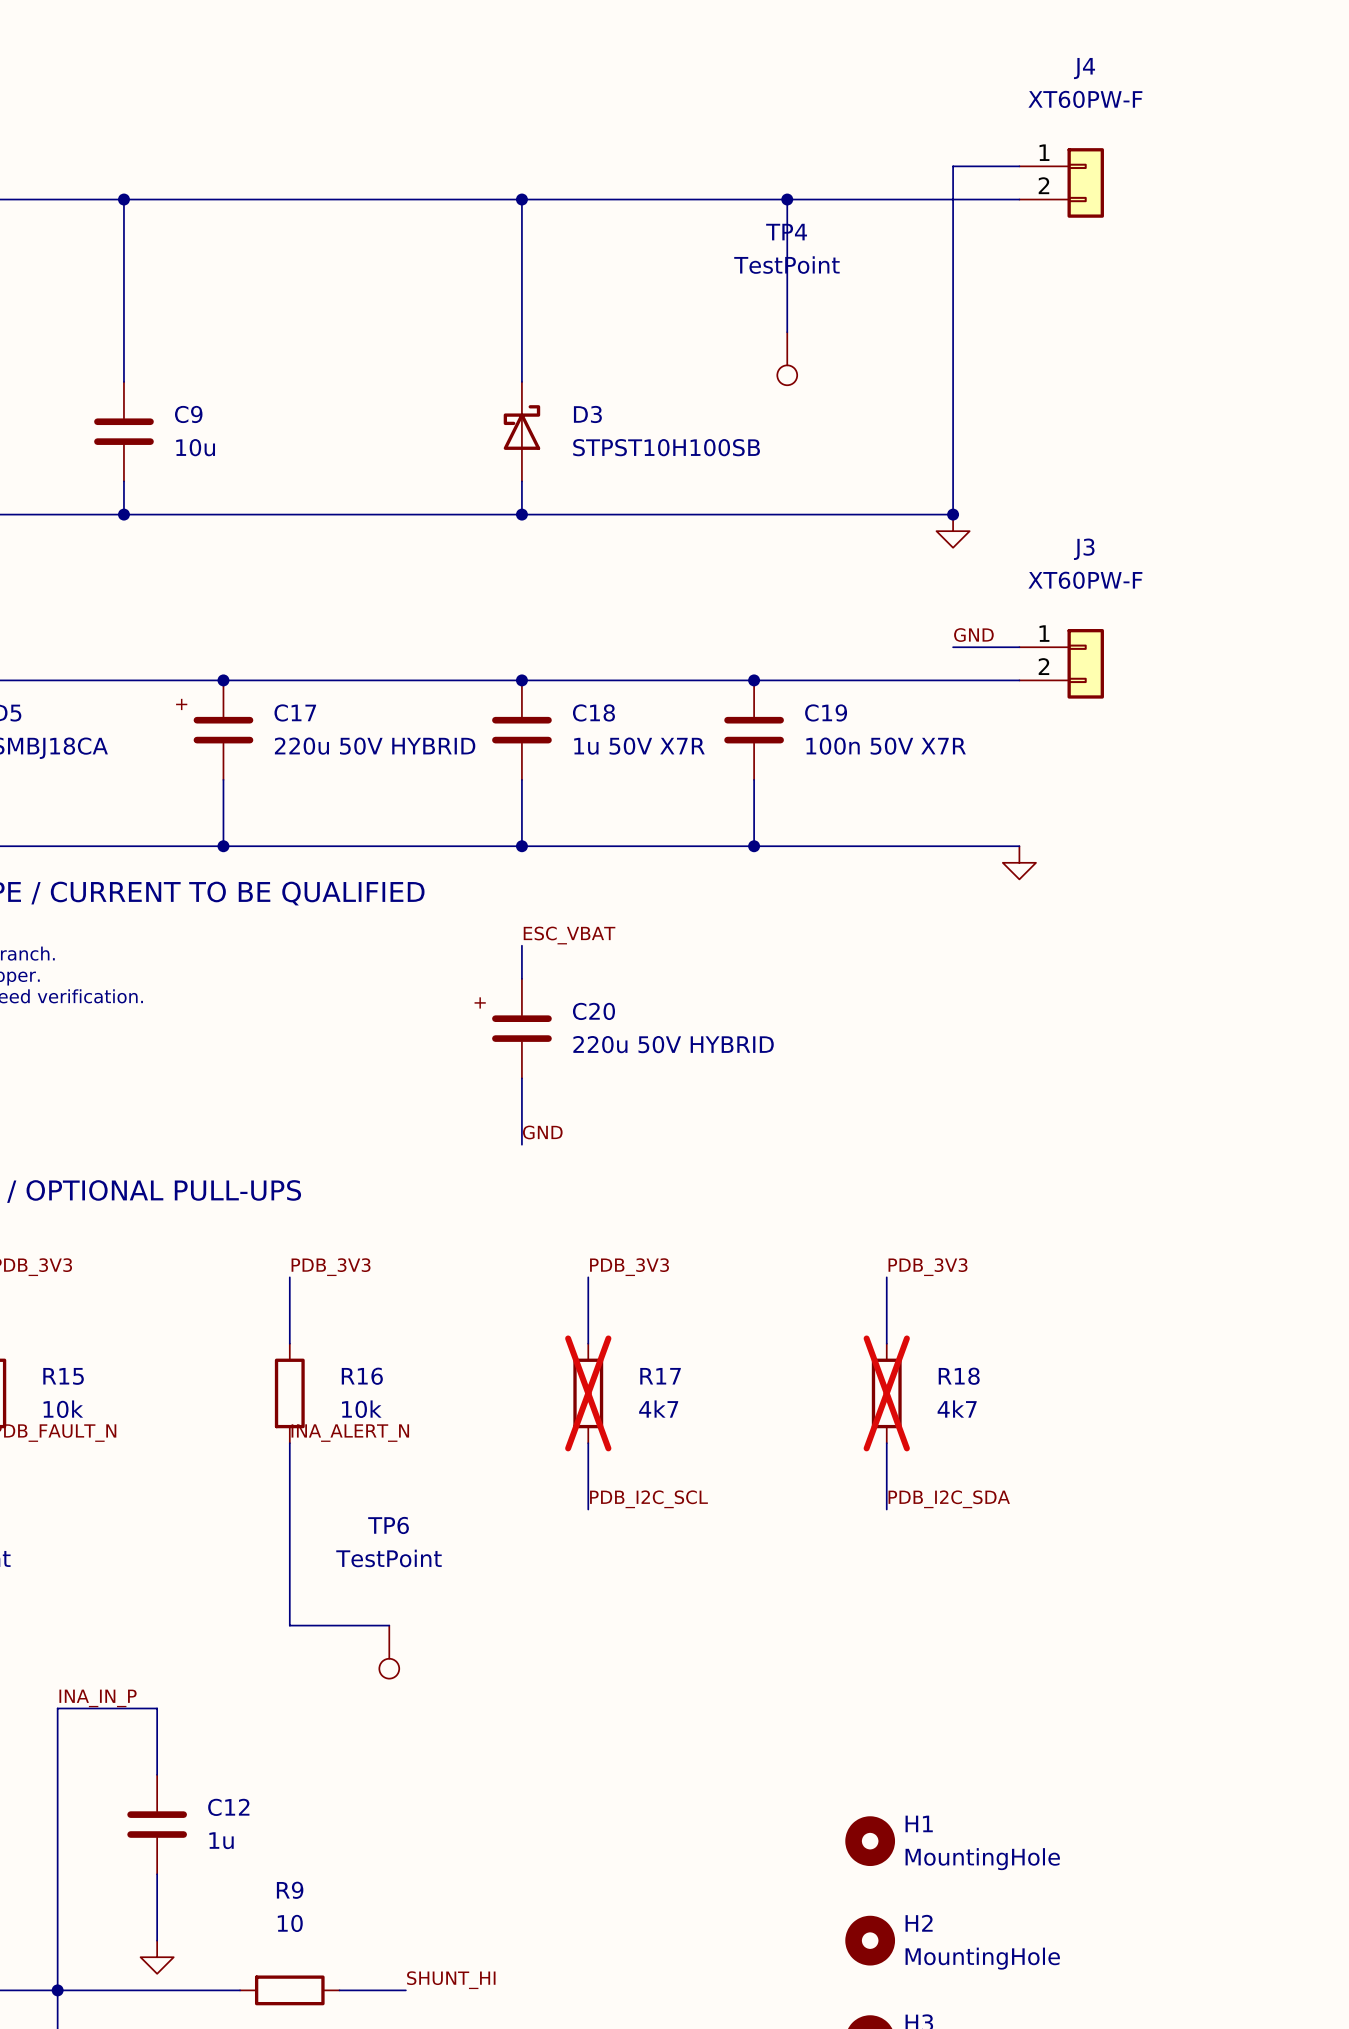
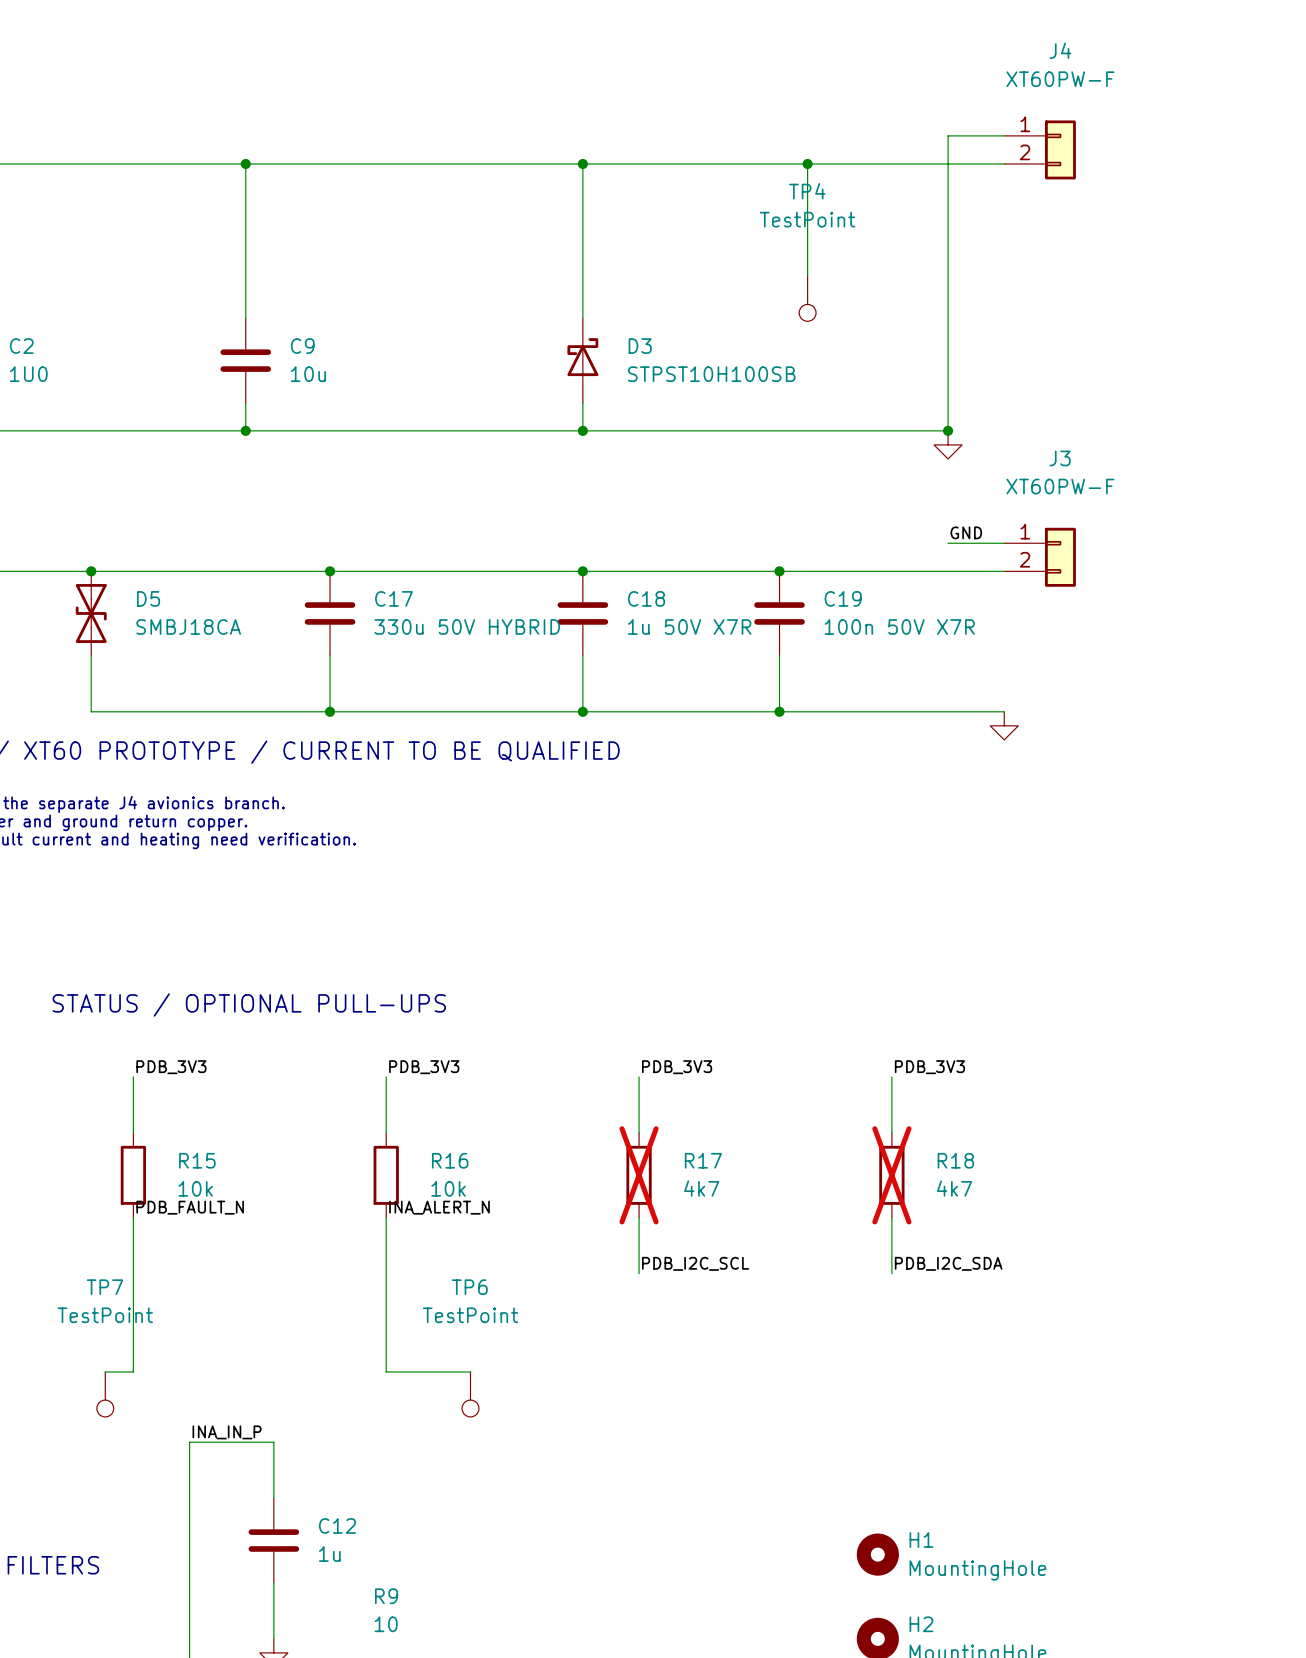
C17 text: + (181, 704) -> none
C17 value: 220u 50V HYBRID (375, 746) -> 330u 50V HYBRID (467, 627)
label: ESC_VBAT (569, 935) -> none
wire: (521, 945) (521, 978) -> none
C20: 220u 50V HYBRID (521, 1028) -> none
wire: (521, 1078) (521, 1144) -> none
label: GND (542, 1132) -> none

